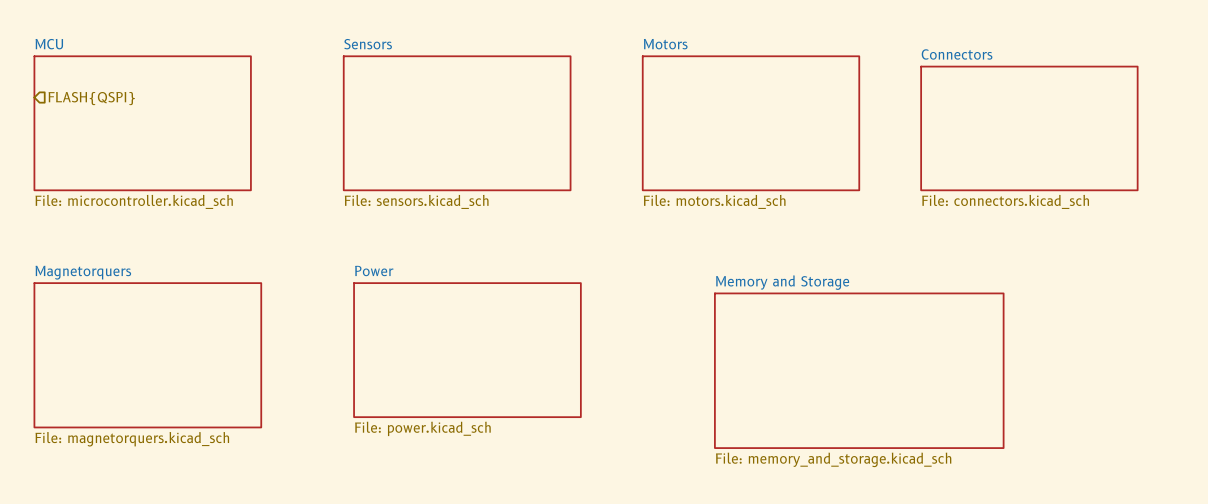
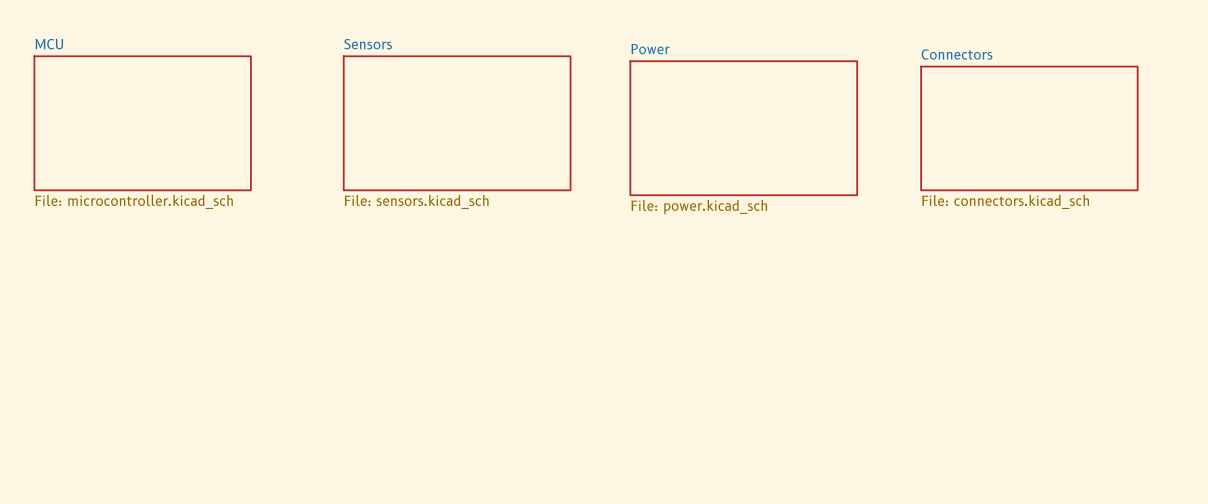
hierarchical label: FLASH{QSPI} (91, 98) -> none
sheet Motors: File: motors.kicad_sch (751, 123) -> none
sheet Power: none -> File: power.kicad_sch (743, 128)
sheet Power: File: power.kicad_sch (467, 350) -> none
sheet Magnetorquers: File: magnetorquers.kicad_sch (147, 355) -> none
sheet Memory and Storage: File: memory_and_storage.kicad_sch (859, 370) -> none

